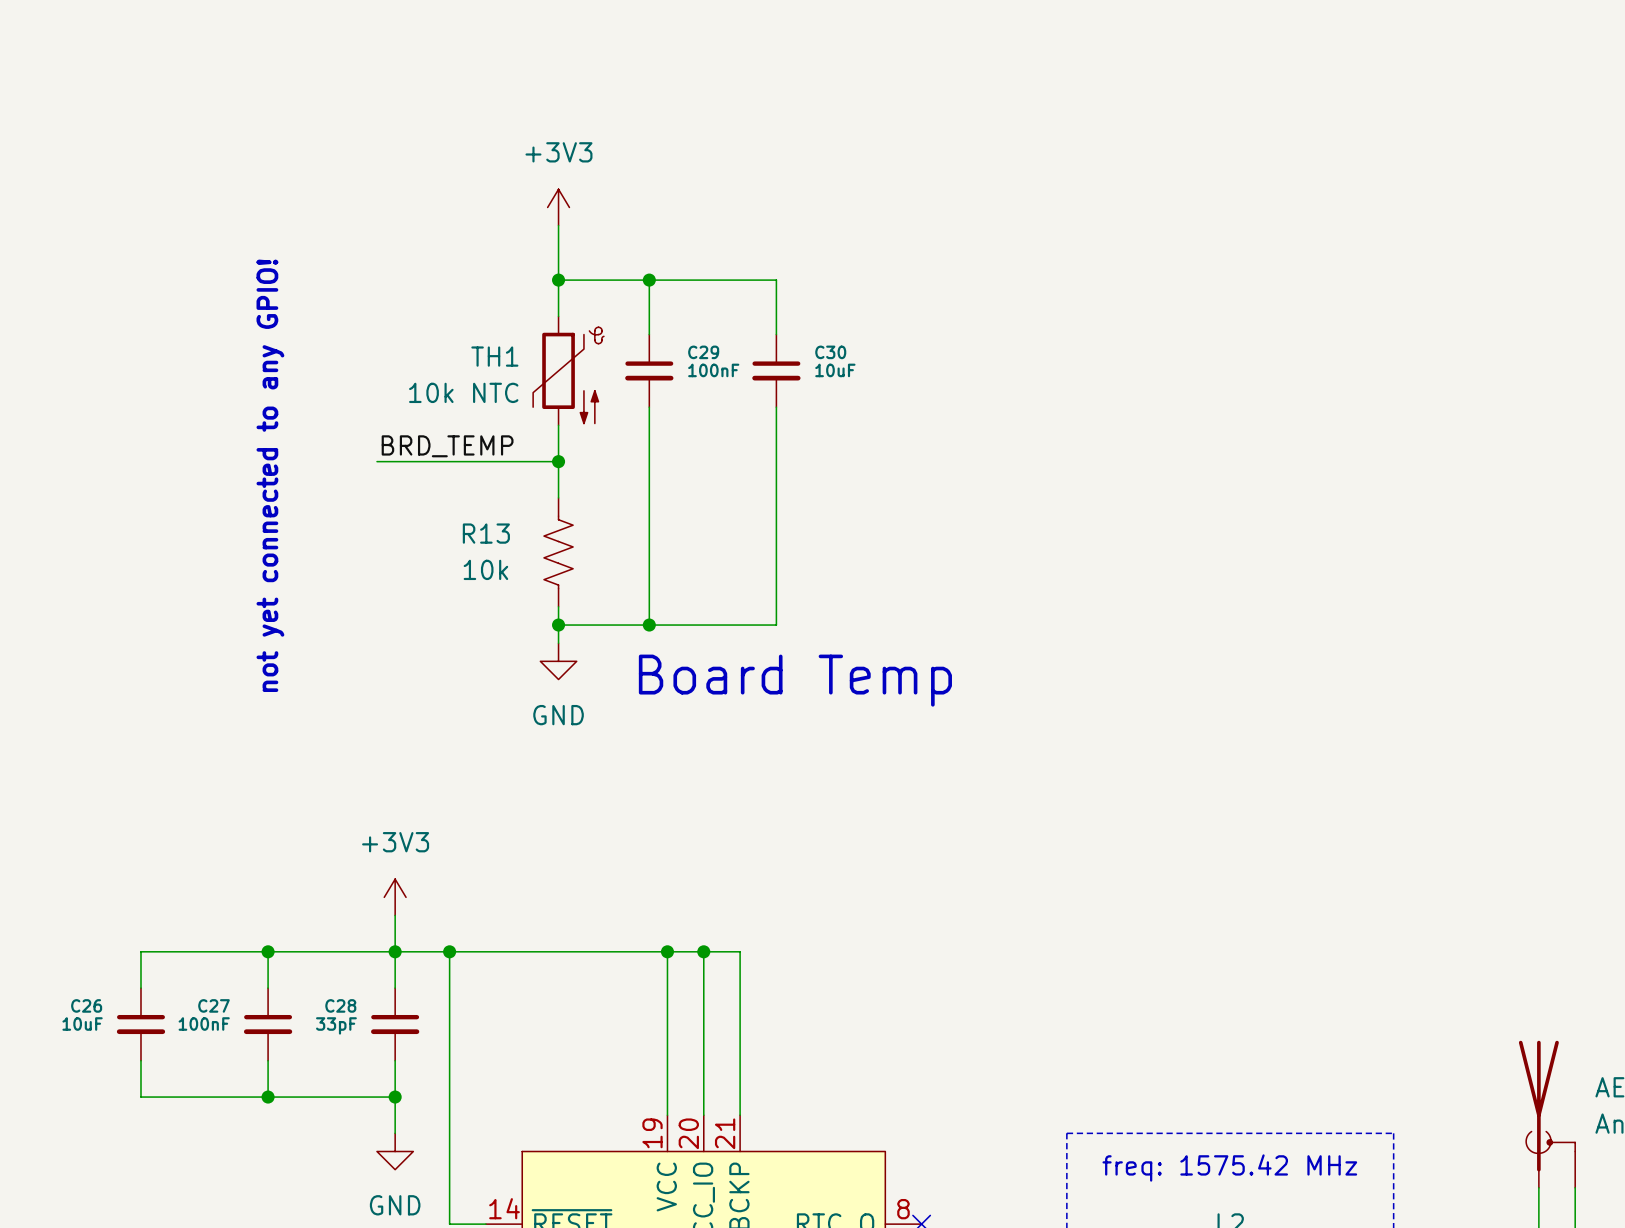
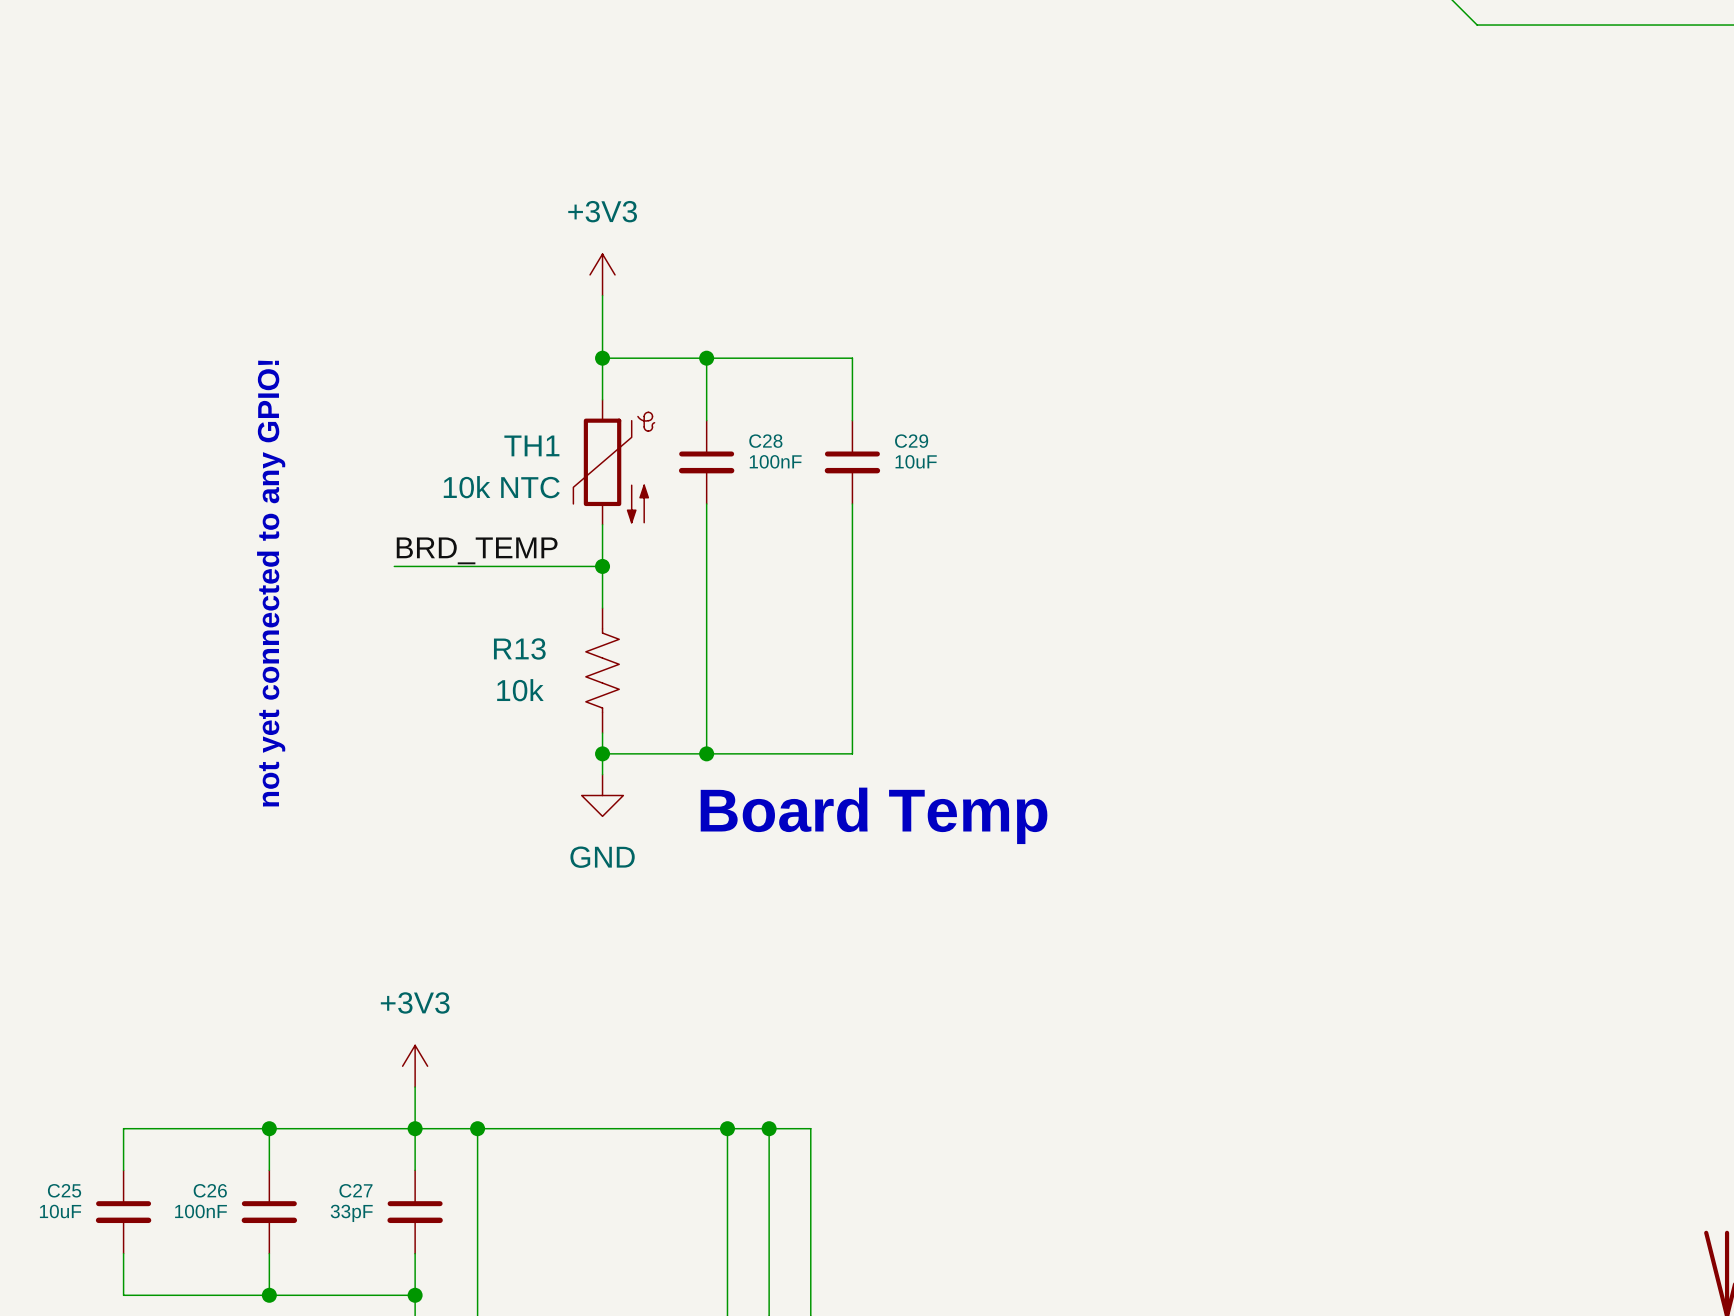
C29 name: C29 (703, 352) -> C28 (765, 441)
C30 name: C30 (830, 352) -> C29 (911, 441)
C26 name: C26 (86, 1005) -> C25 (64, 1190)
C27 name: C27 (213, 1005) -> C26 (210, 1190)
C28 name: C28 (340, 1005) -> C27 (355, 1190)

